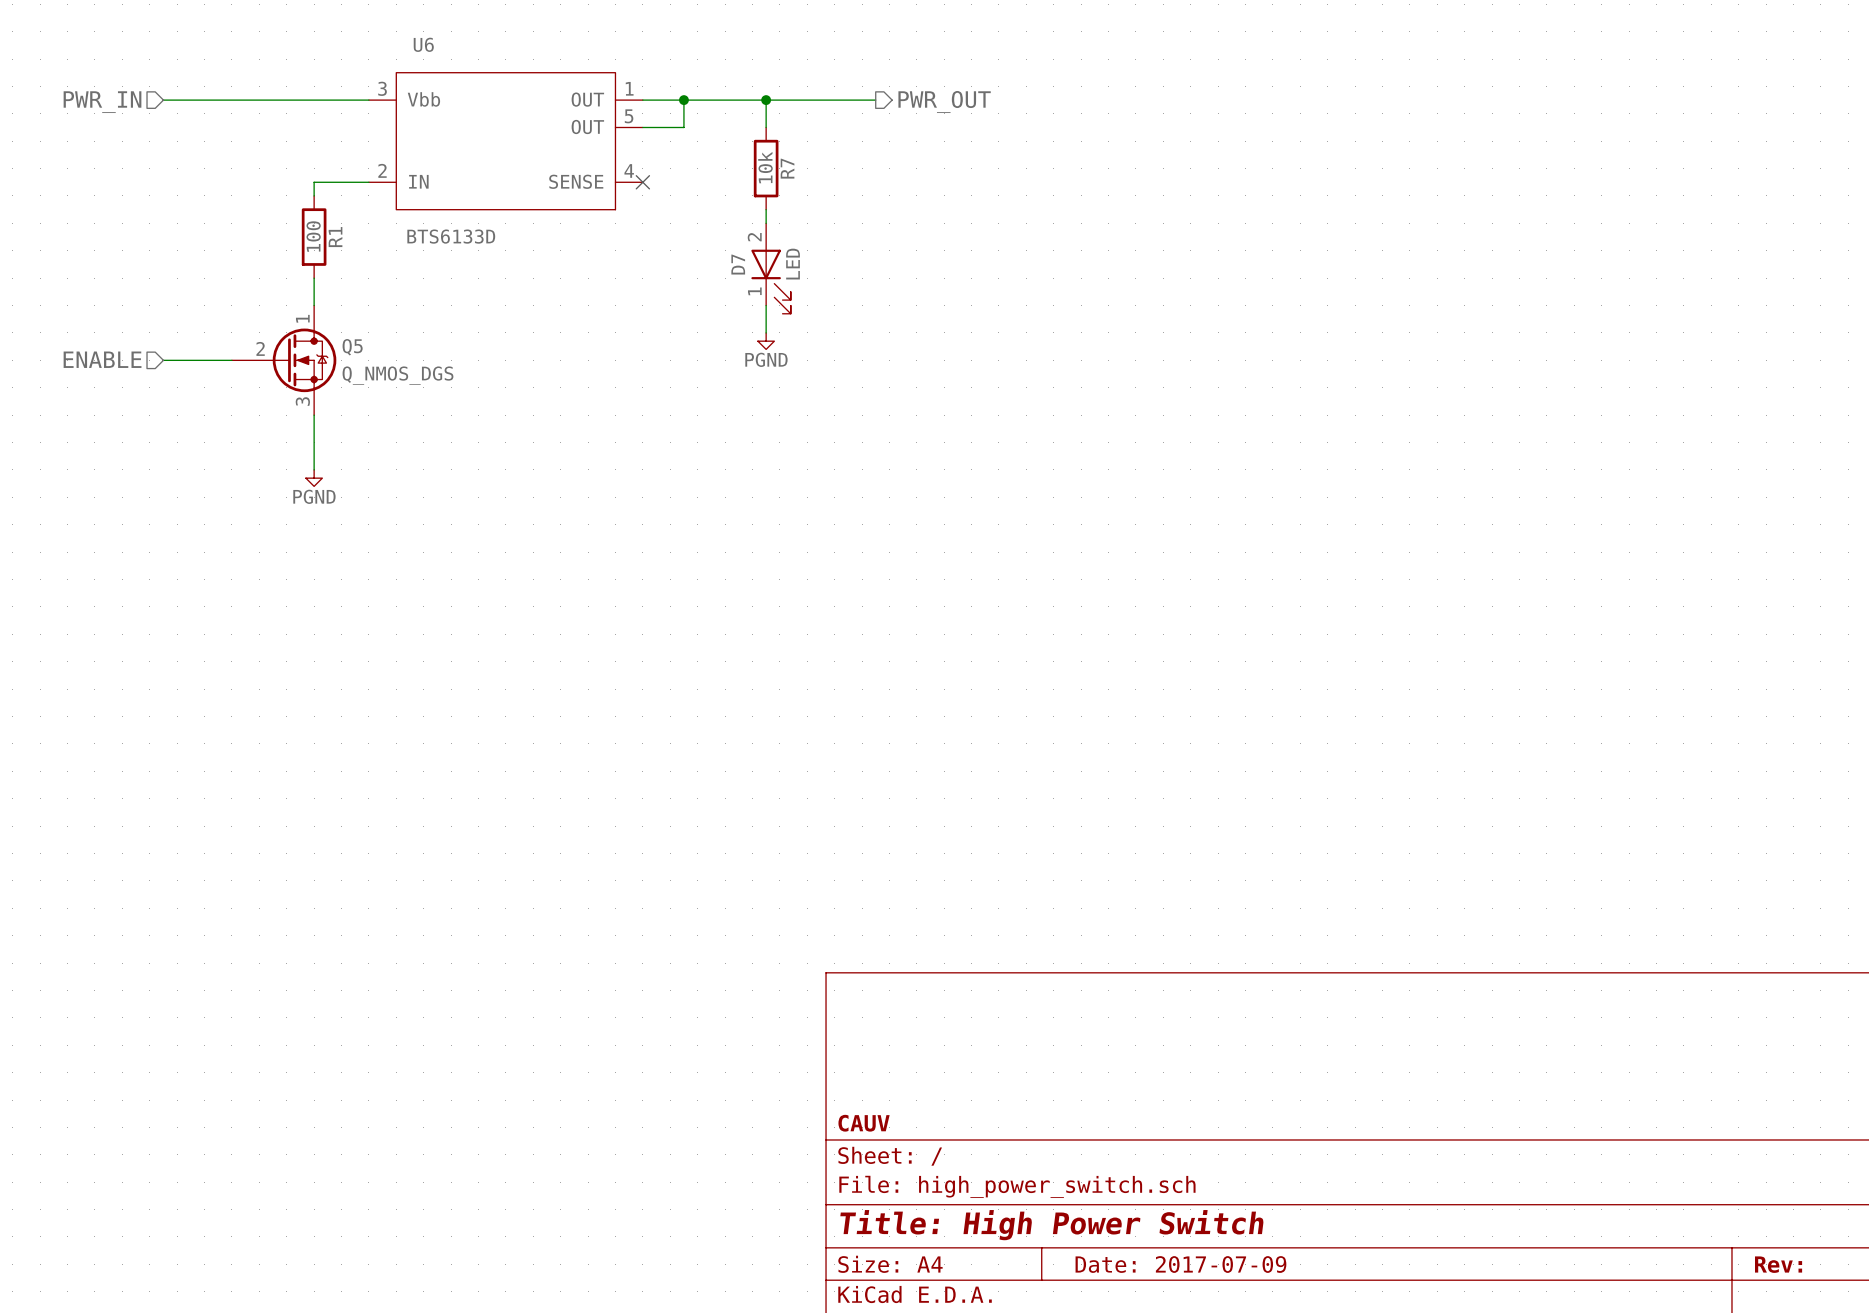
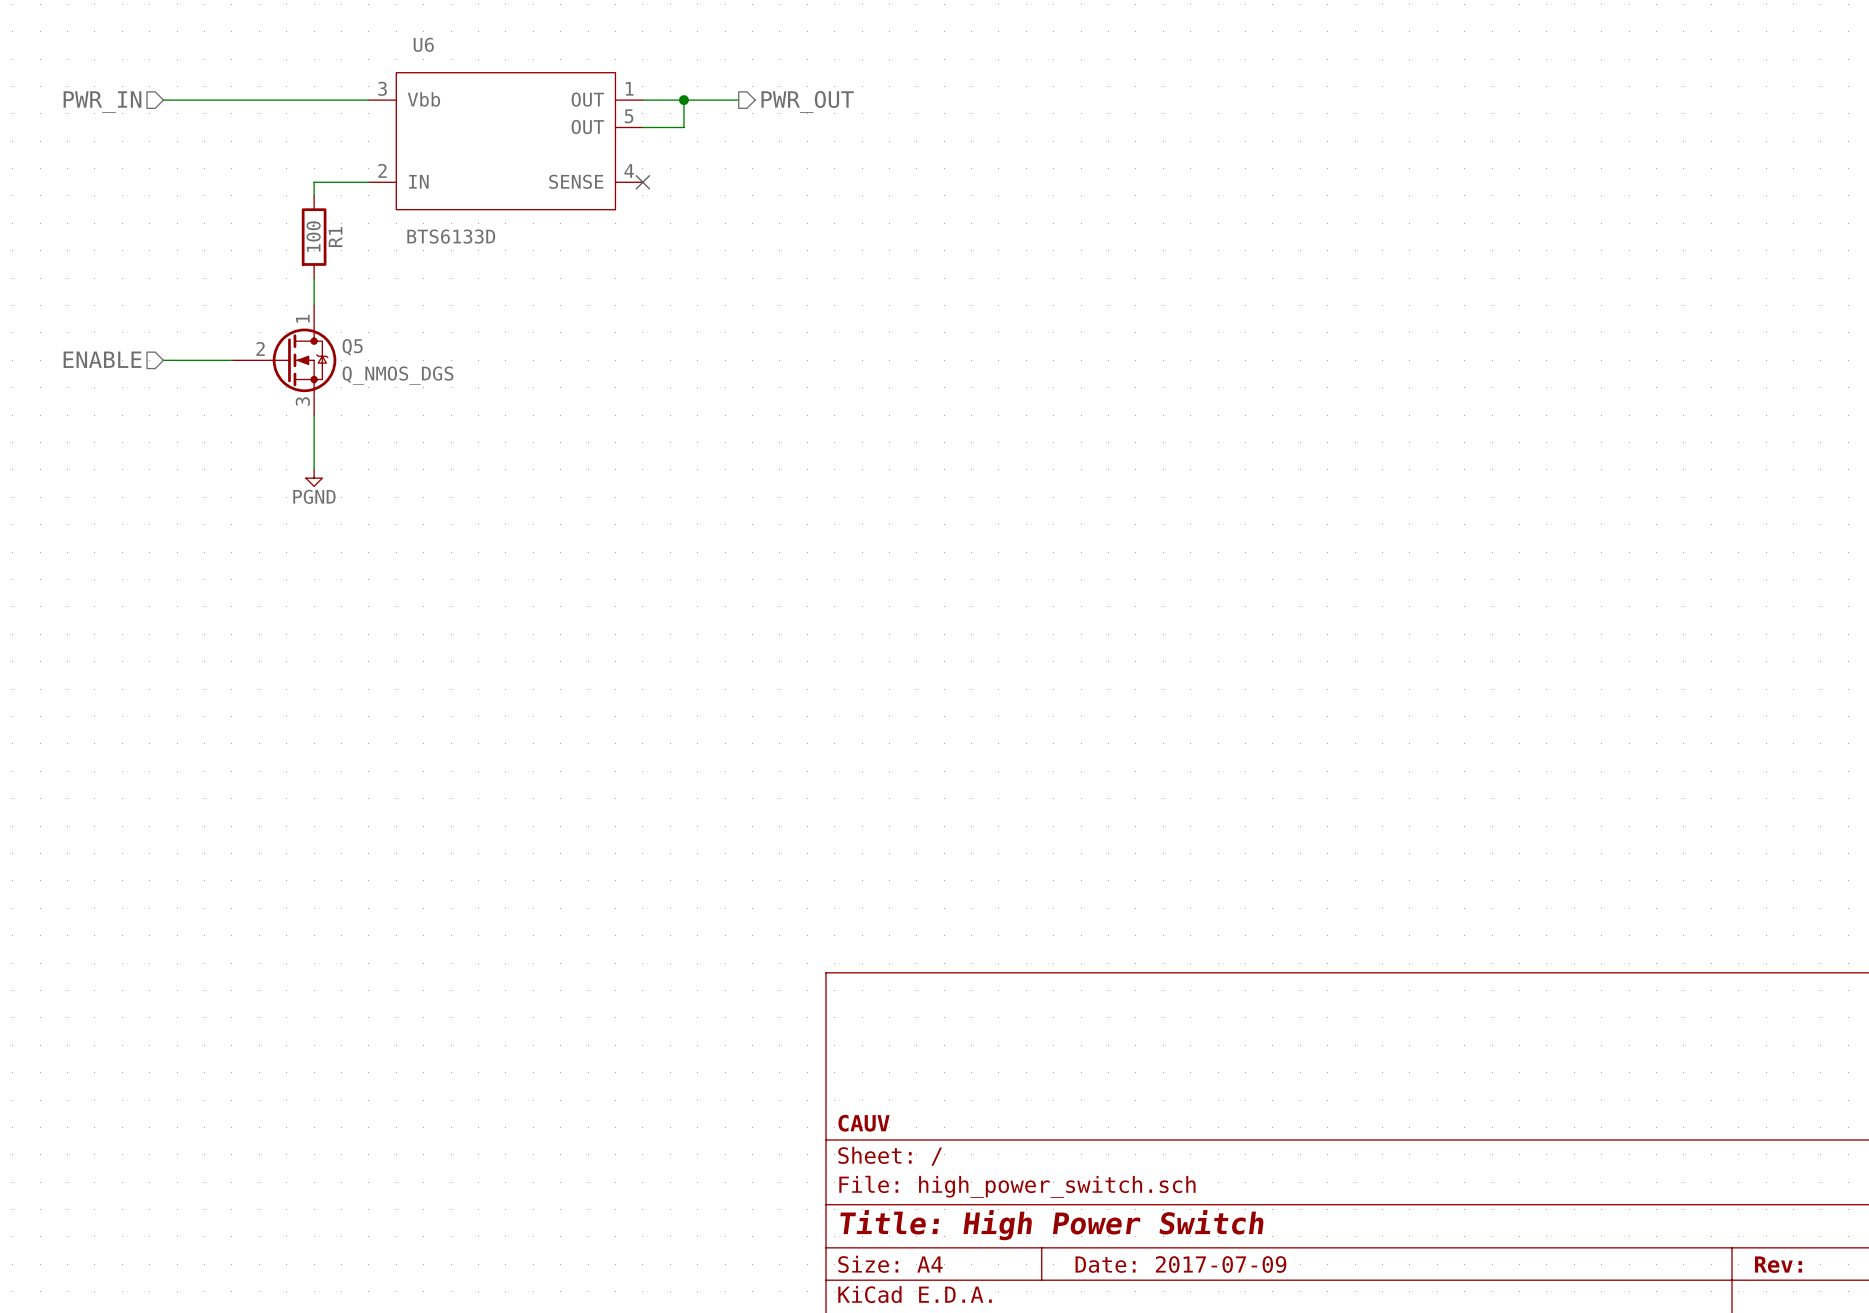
wire: (738, 100) (875, 100) -> none
wire: (766, 100) (766, 127) -> none
junction: (766, 100) -> none
hierarchical label position: PWR_OUT (944, 101) -> PWR_OUT (807, 101)
R7: 10k (766, 168) -> none
wire: (766, 209) (766, 223) -> none
D7: LED (771, 268) -> none
wire: (766, 305) (766, 332) -> none
power symbol: PGND (766, 341) -> none

